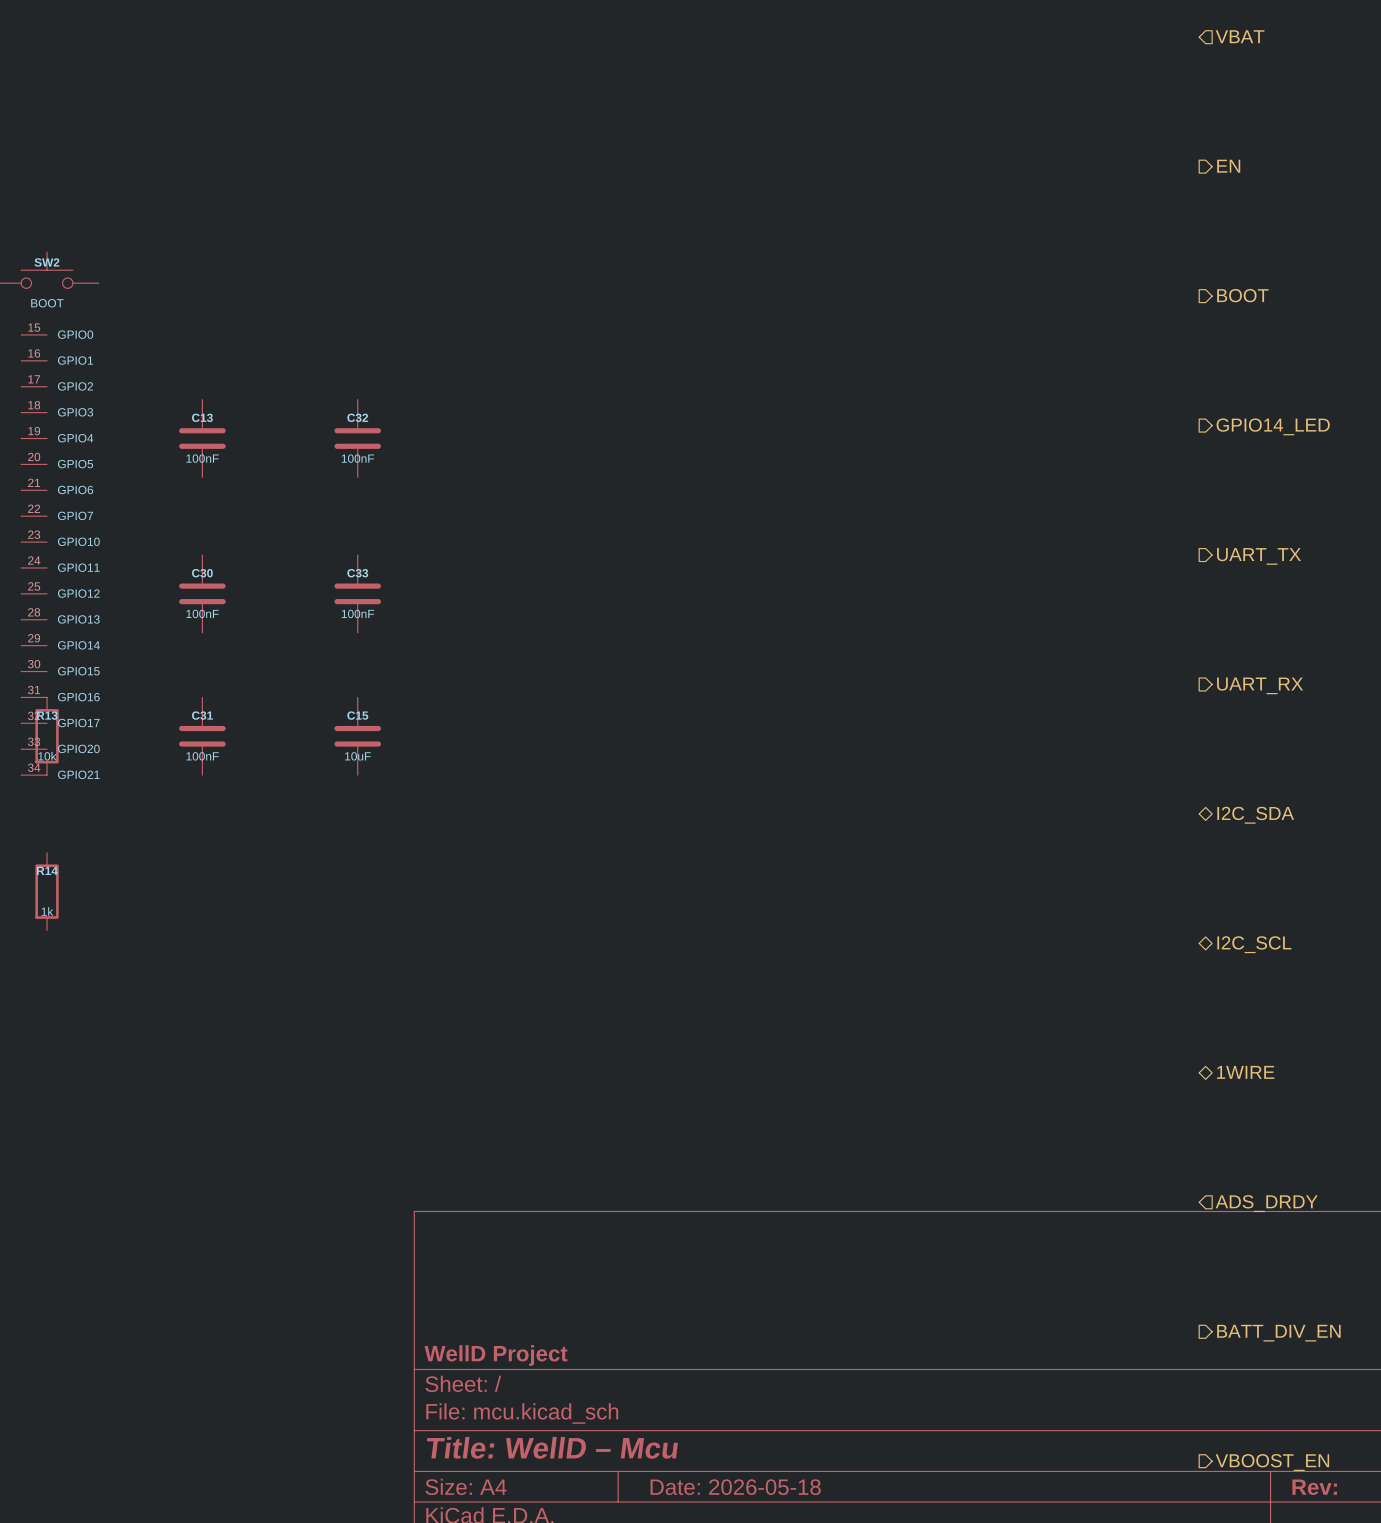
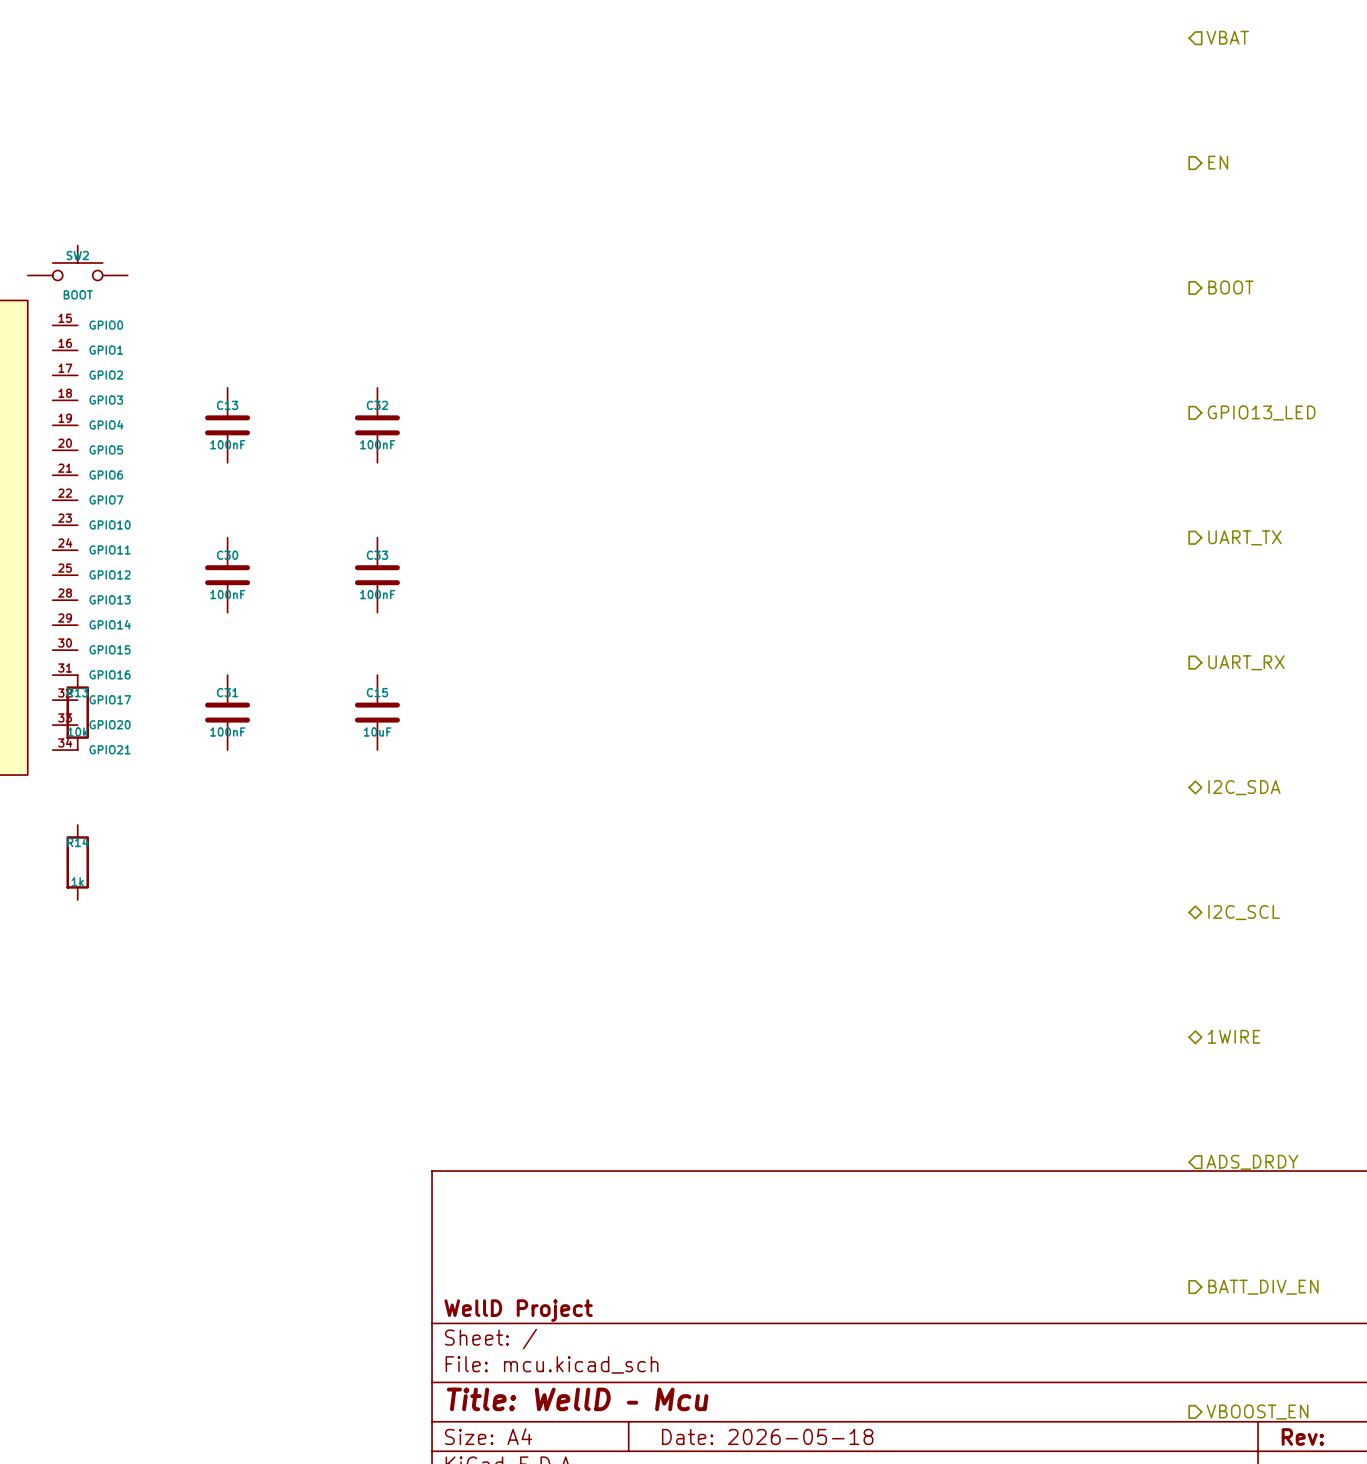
hierarchical label: GPIO14_LED (1273, 426) -> GPIO13_LED (1261, 412)

